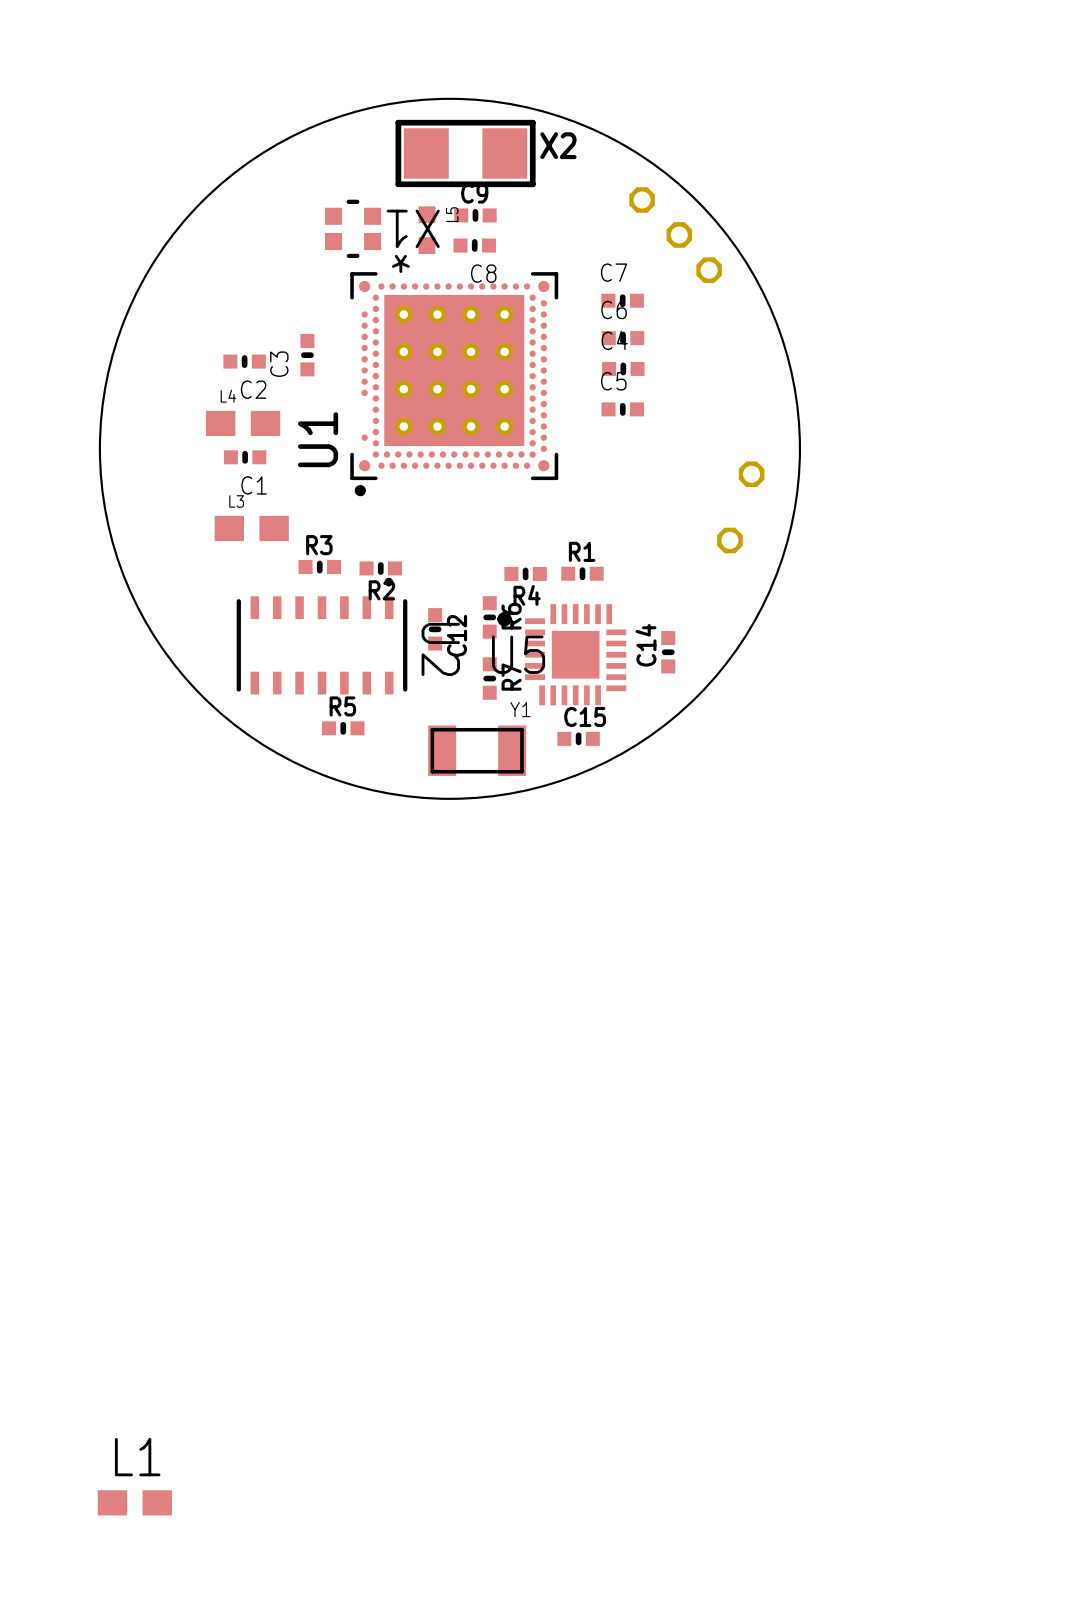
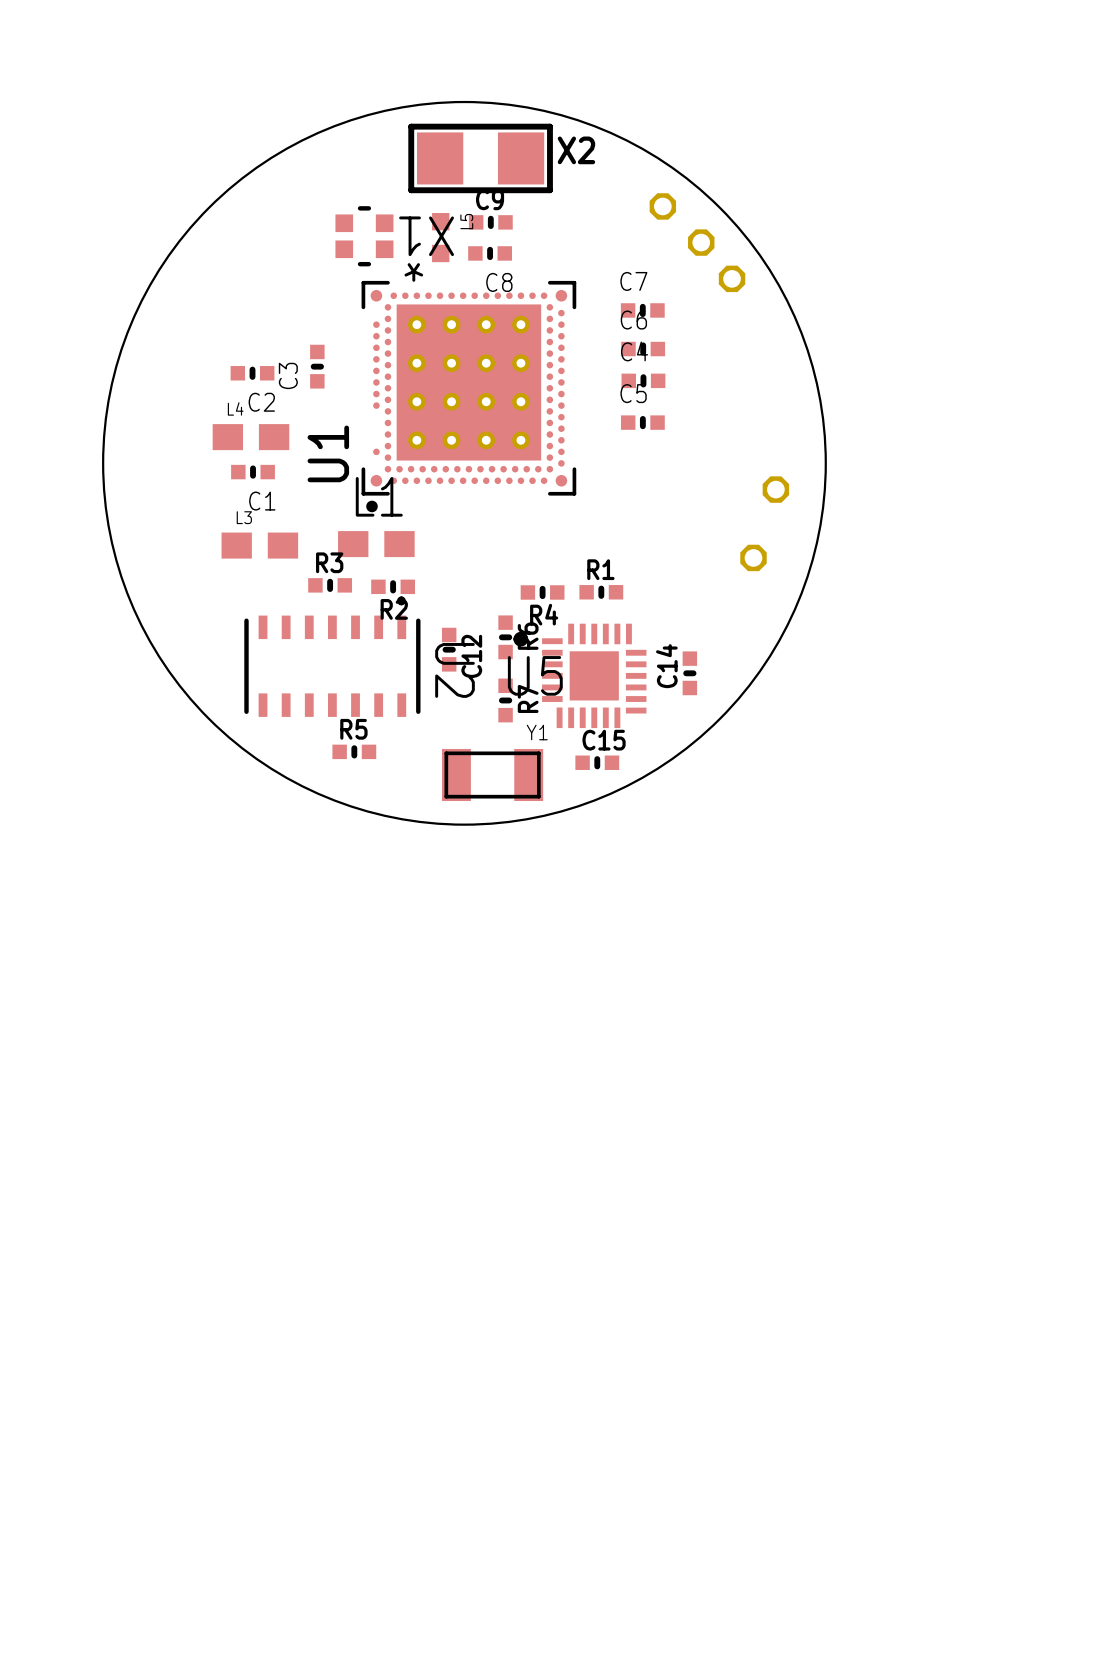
L1 position: (134, 1502) -> (376, 544)

